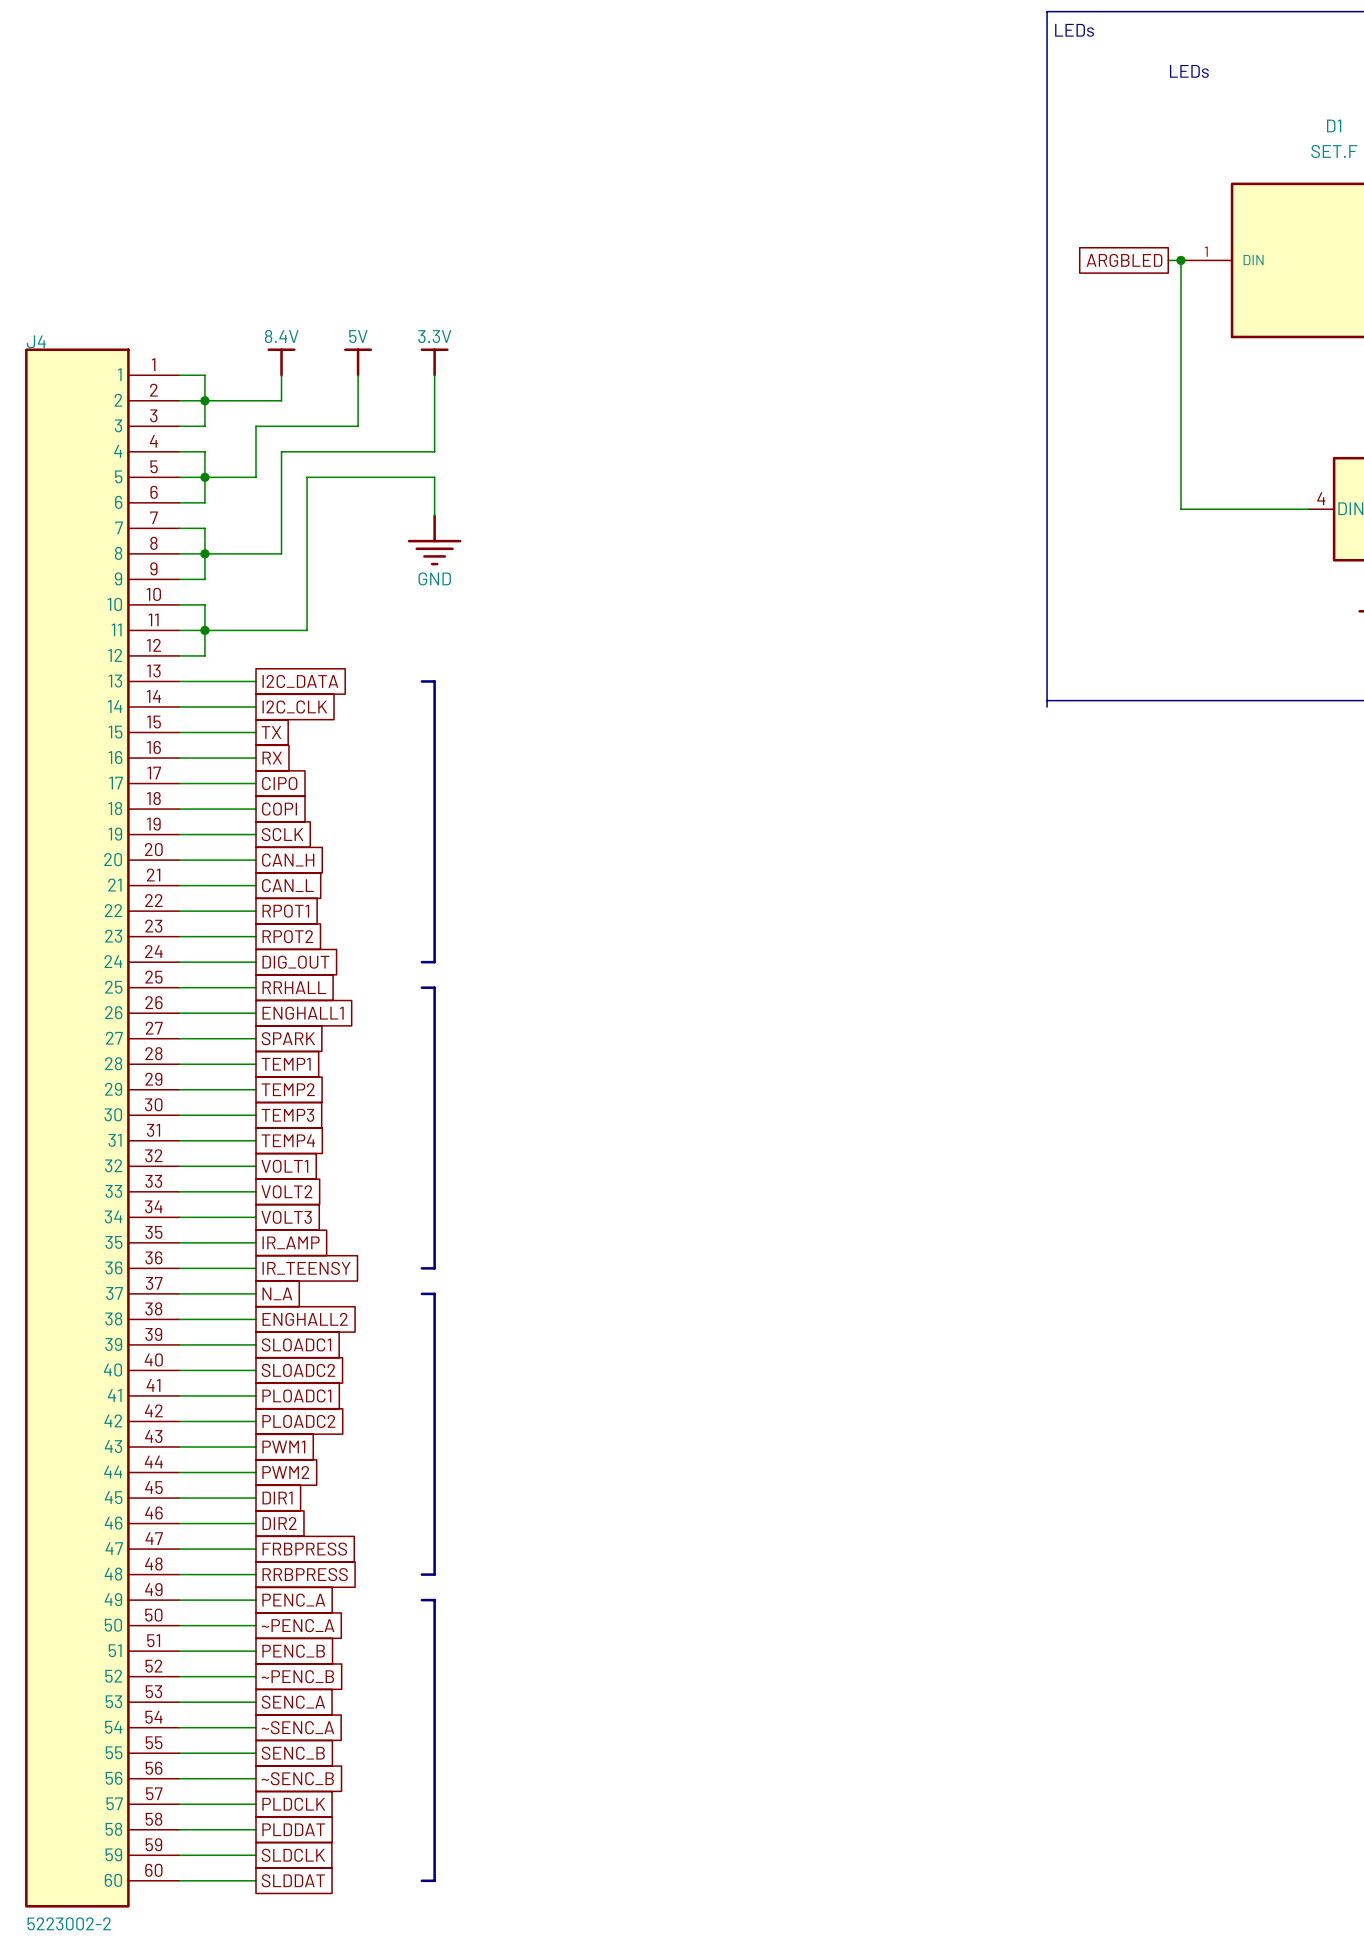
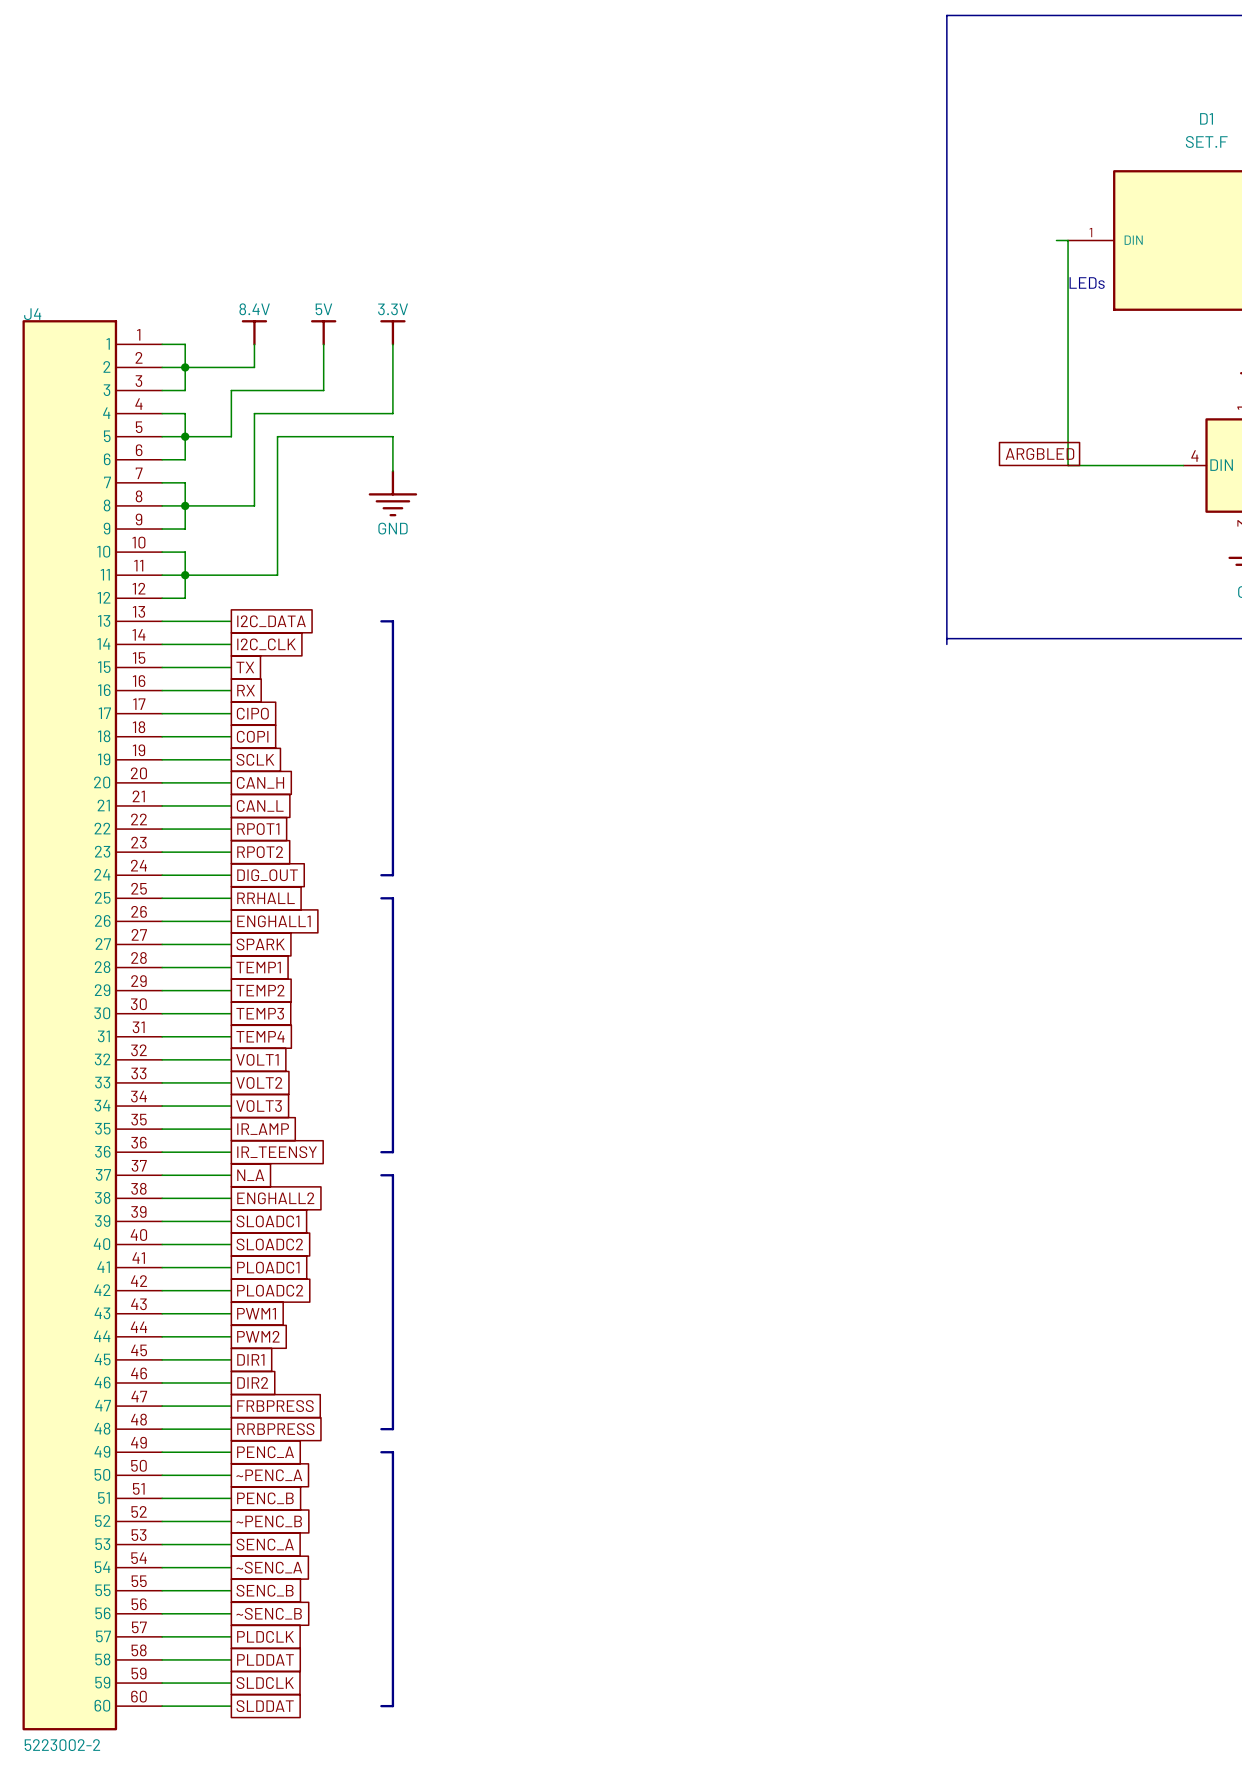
text: LEDs (1074, 30) -> none
text: LEDs (1189, 71) -> none
global label position: ARGBLED (1124, 260) -> ARGBLED (1039, 454)
junction: (1181, 260) -> none
text: none -> LEDs (1087, 283)

